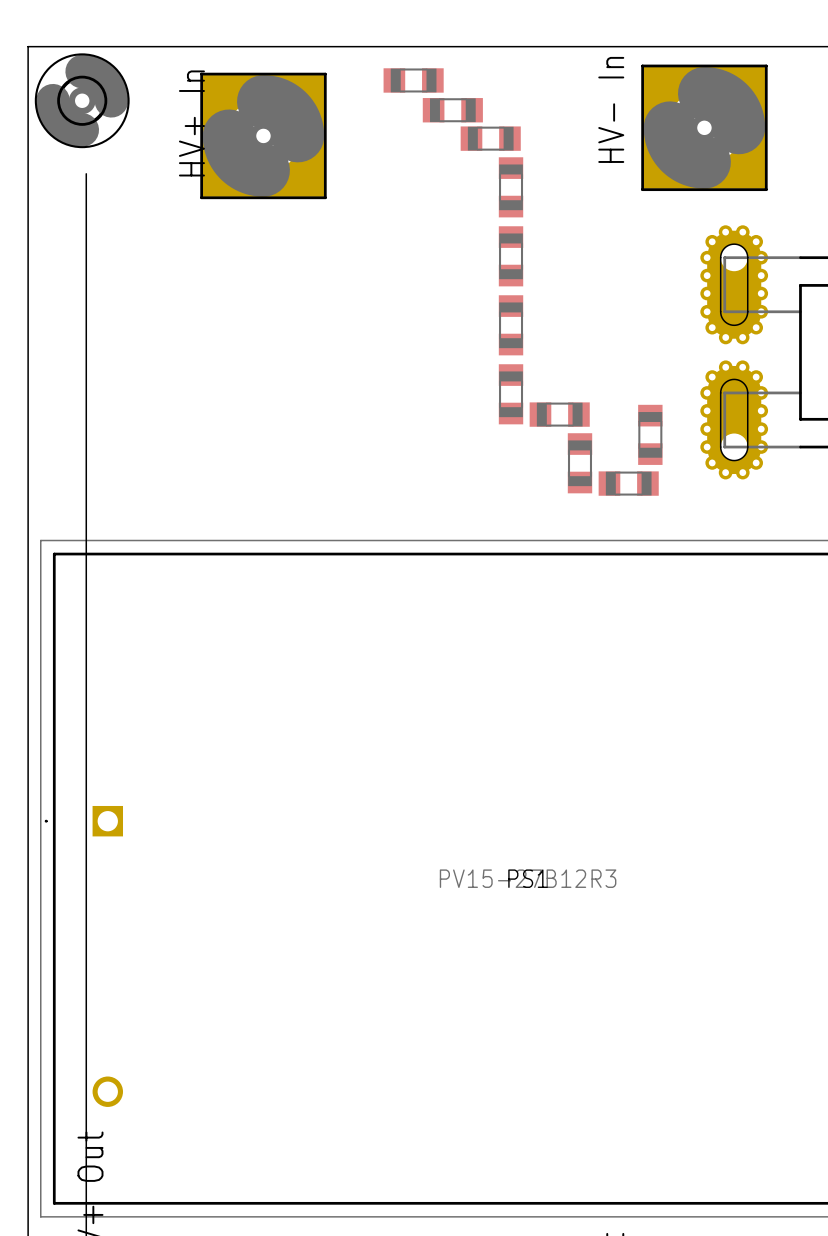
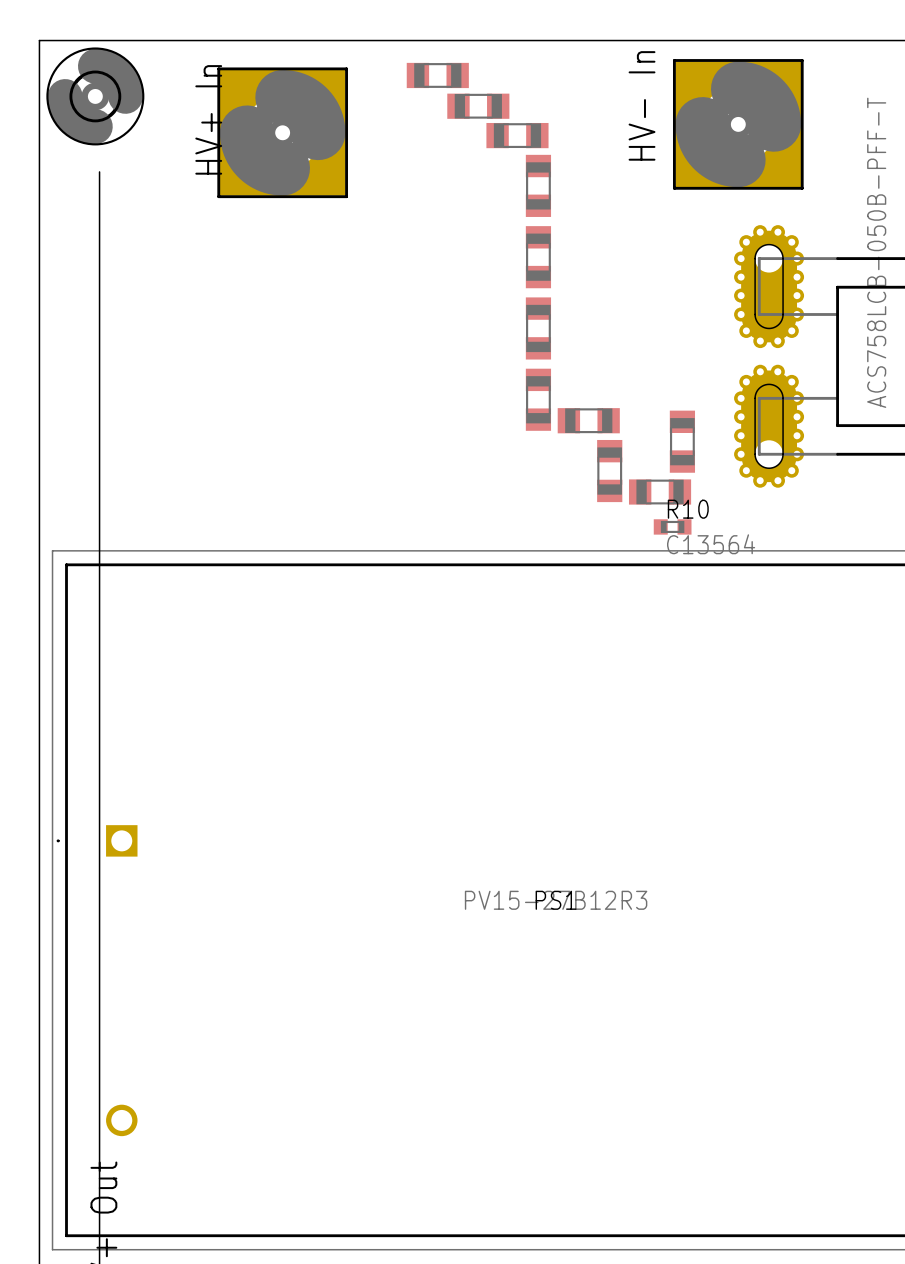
R10: none -> C13564 (672, 526)

